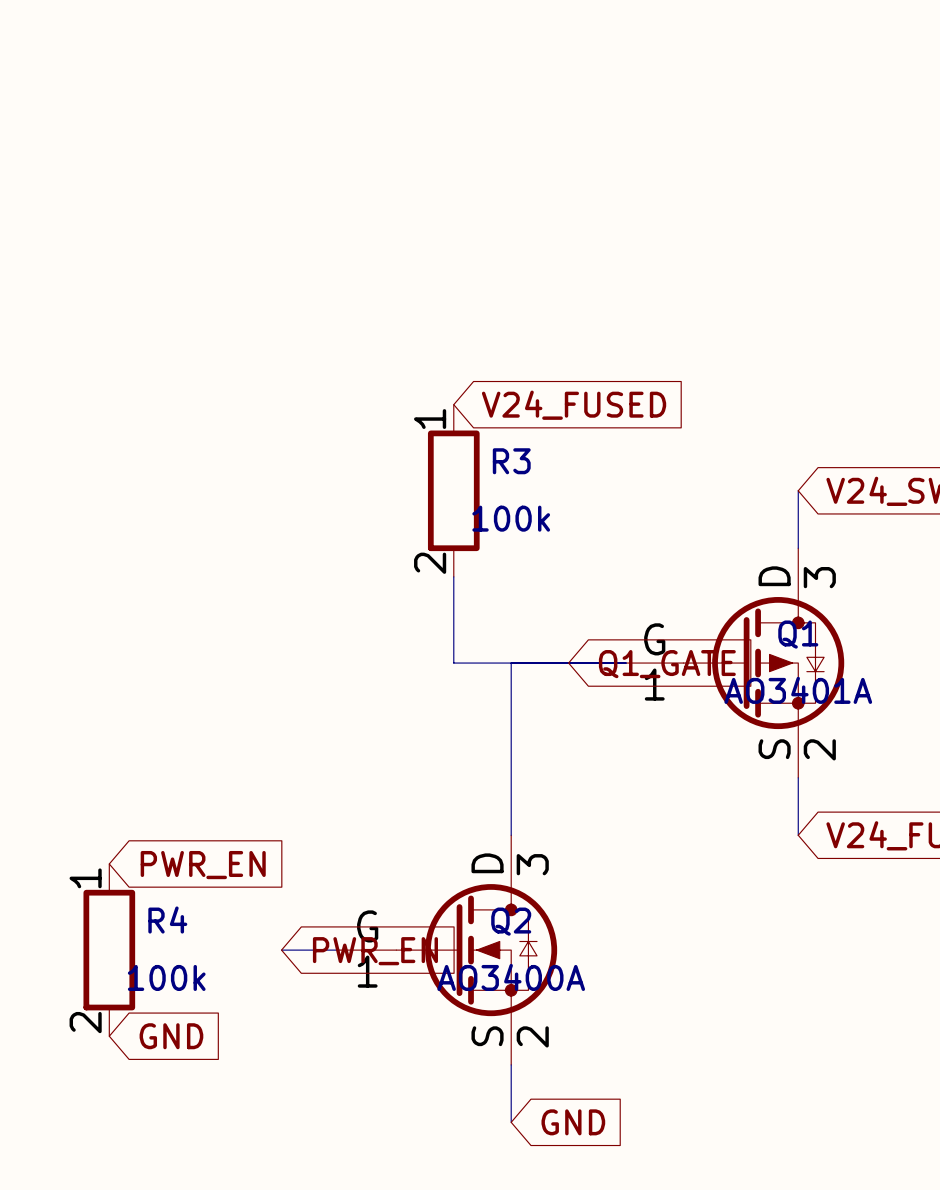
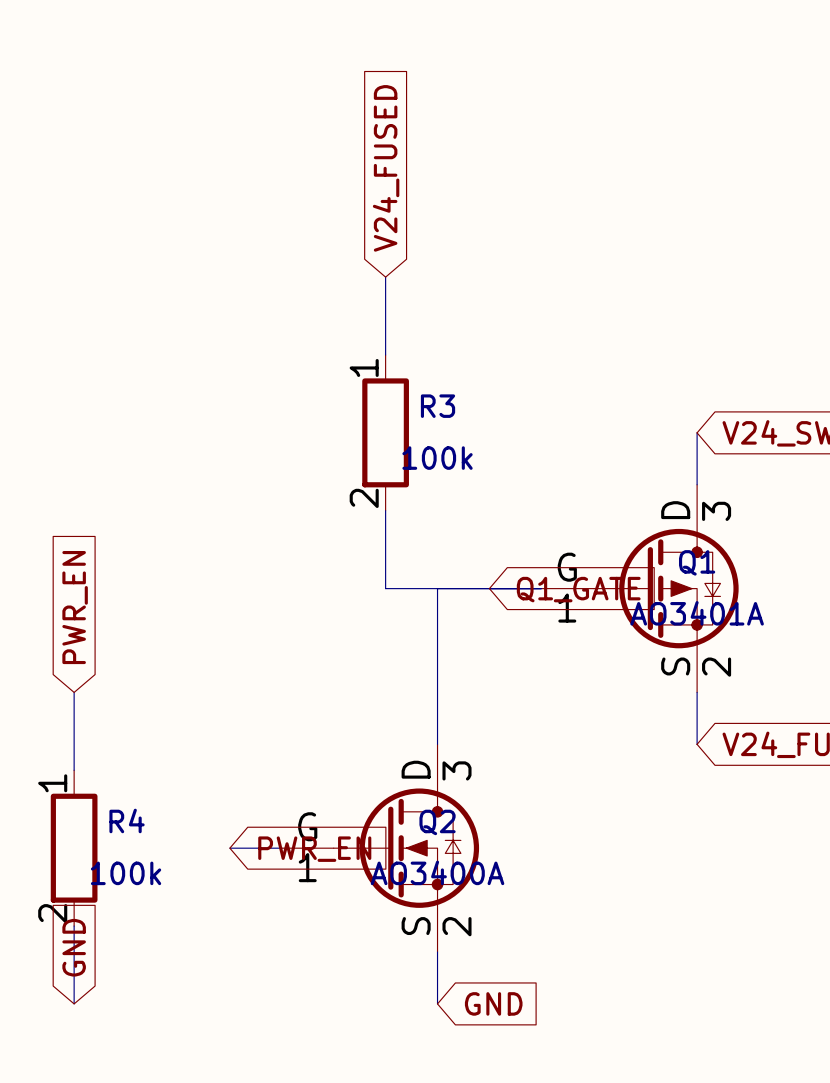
wire: none -> (385, 277) (385, 355)
global label rotation: 0° (574, 405) -> 90° counterclockwise (386, 168)
wire: none -> (74, 692) (74, 770)
global label rotation: 0° (203, 865) -> 90° counterclockwise (75, 607)
global label position: PWR_EN (203, 865) -> PWR_EN (75, 607)
wire: none -> (74, 926) (74, 1003)
global label rotation: 0° (171, 1036) -> 90° counterclockwise (74, 947)

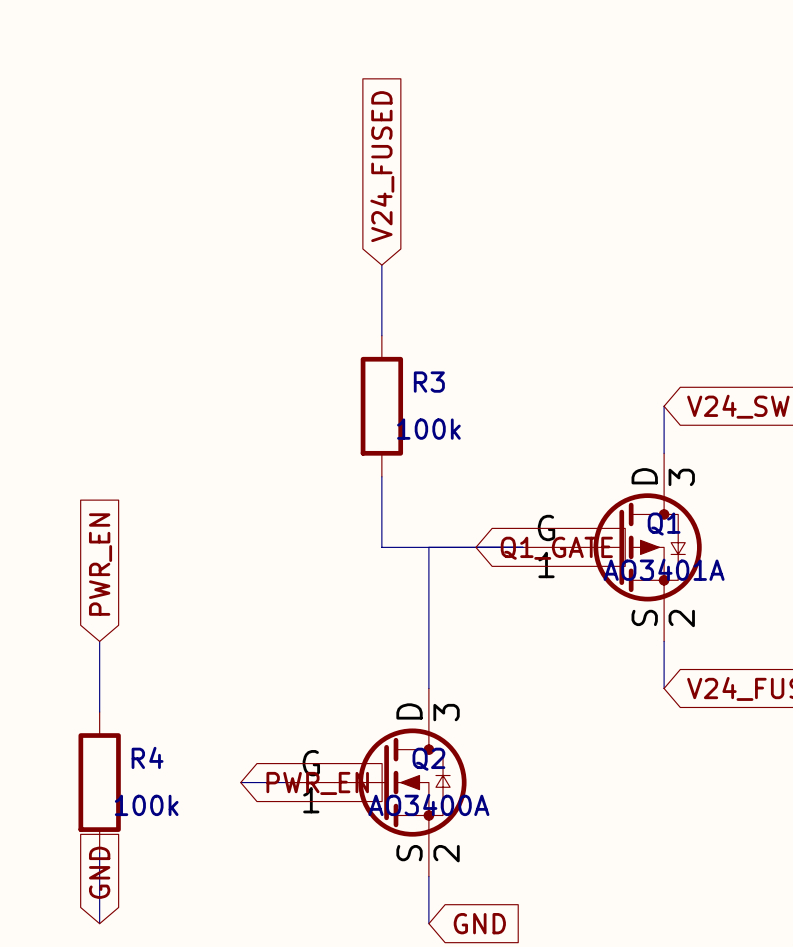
R3 pin number: 1 (364, 367) -> none
R3 pin number: 2 (364, 498) -> none
R4 pin number: 1 (52, 783) -> none
R4 pin number: 2 (52, 913) -> none

